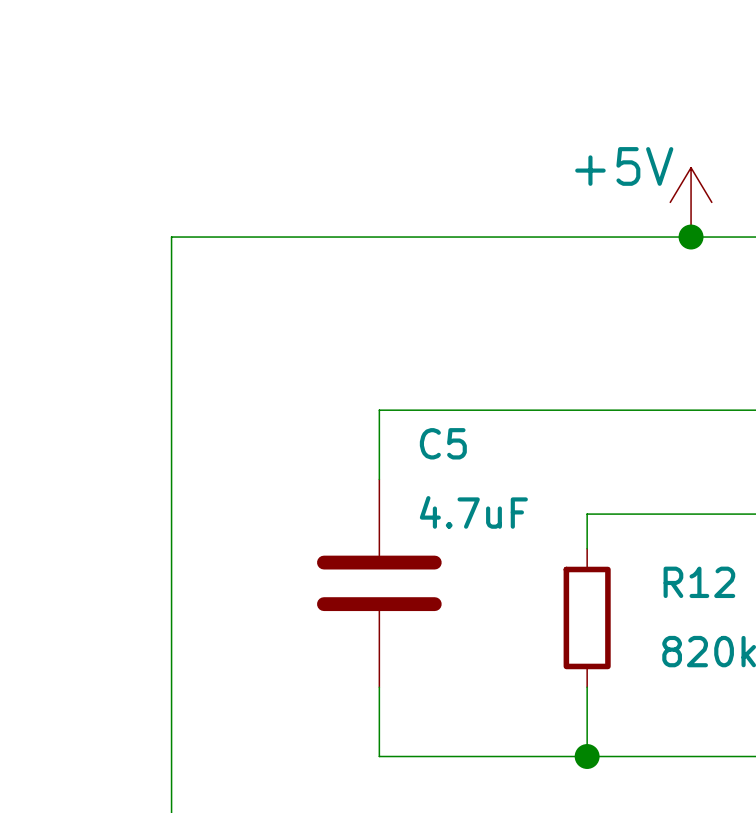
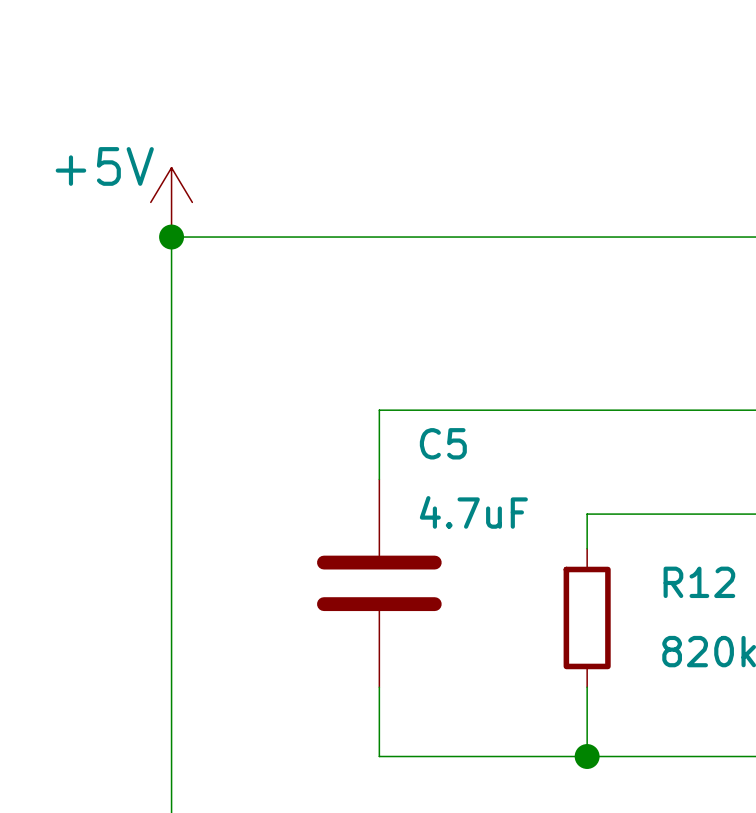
power symbol position: +5V (691, 202) -> +5V (171, 202)
junction: none -> (171, 237)
junction: (691, 237) -> none

